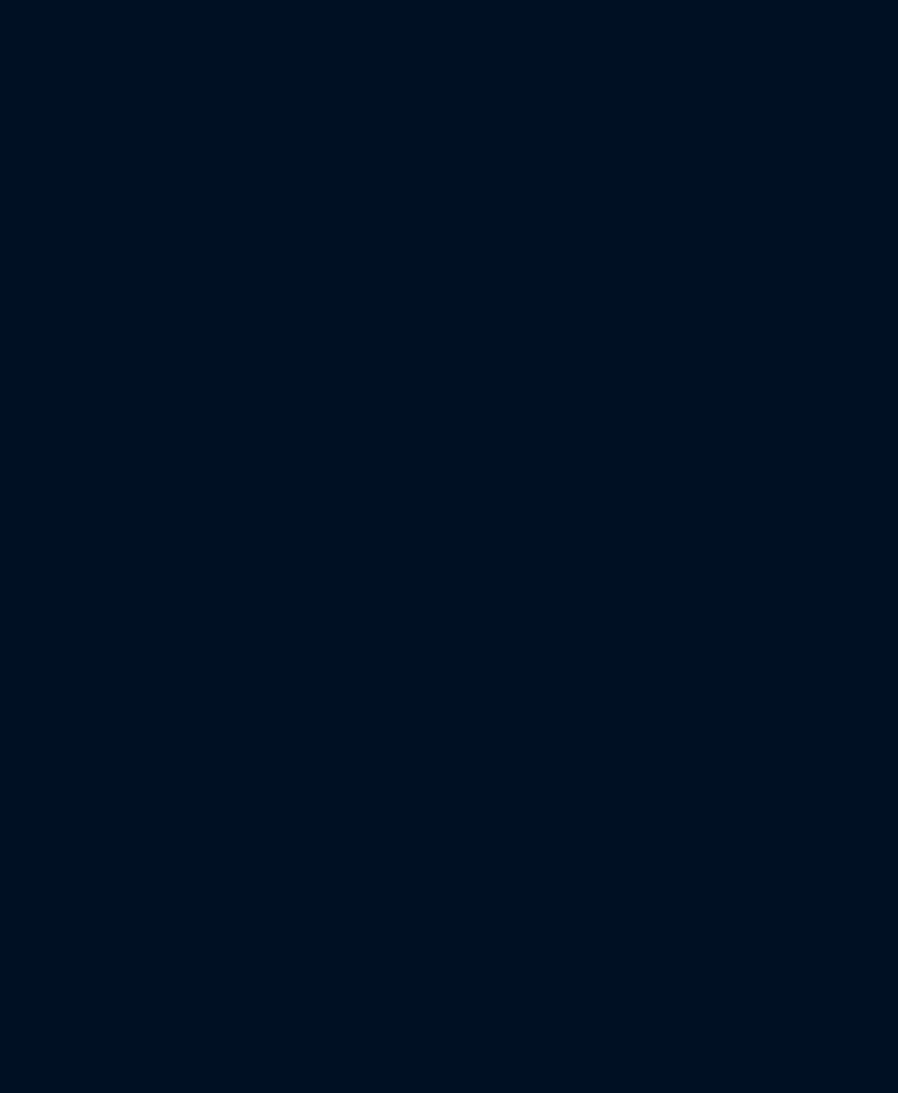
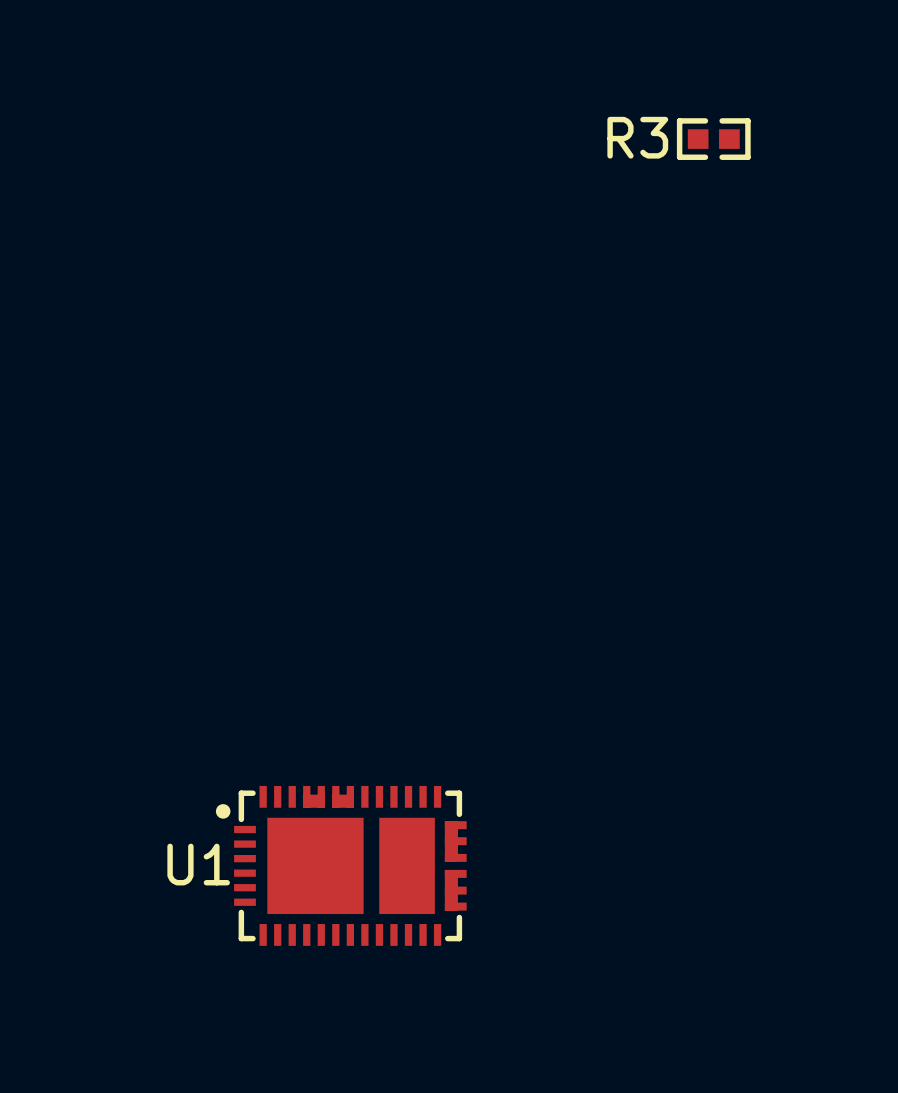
R3: none -> (713, 139)
U1: none -> (341, 865)

